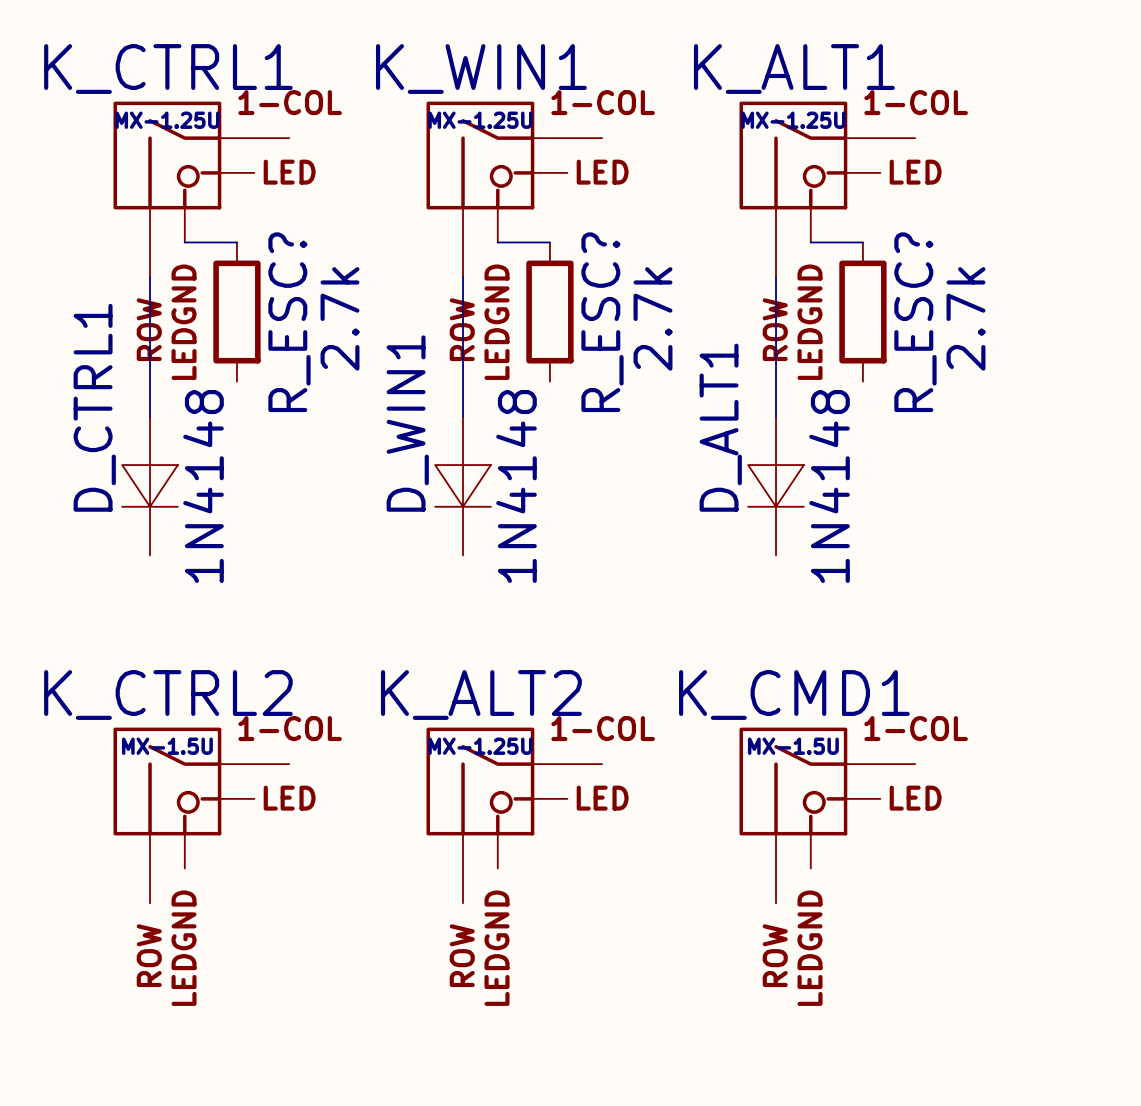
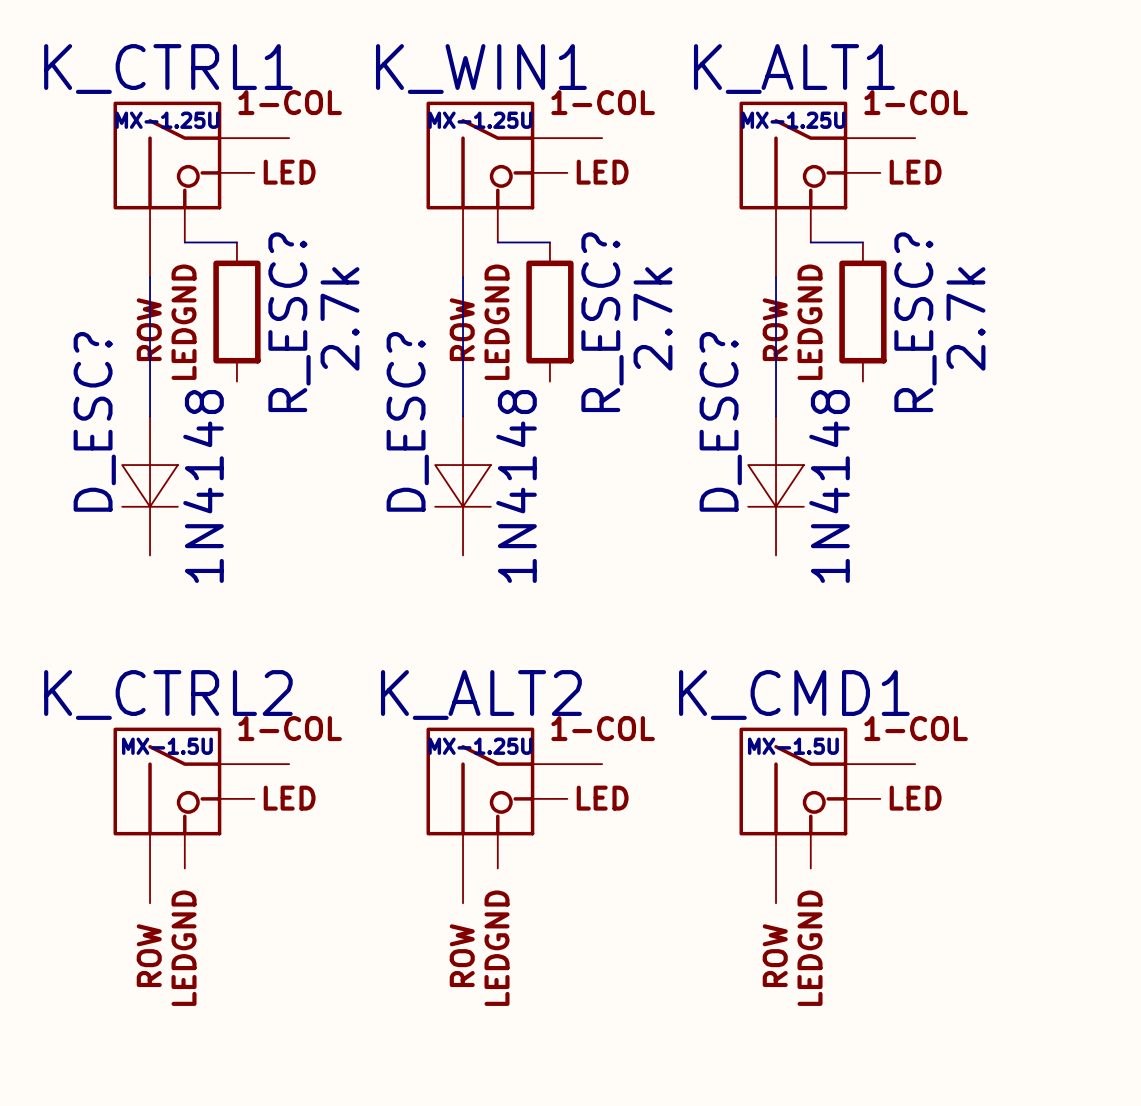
D_CTRL1 name: D_CTRL1 (94, 407) -> D_ESC? (94, 421)
D_WIN1 name: D_WIN1 (407, 423) -> D_ESC? (407, 421)
D_ALT1 name: D_ALT1 (720, 427) -> D_ESC? (720, 421)

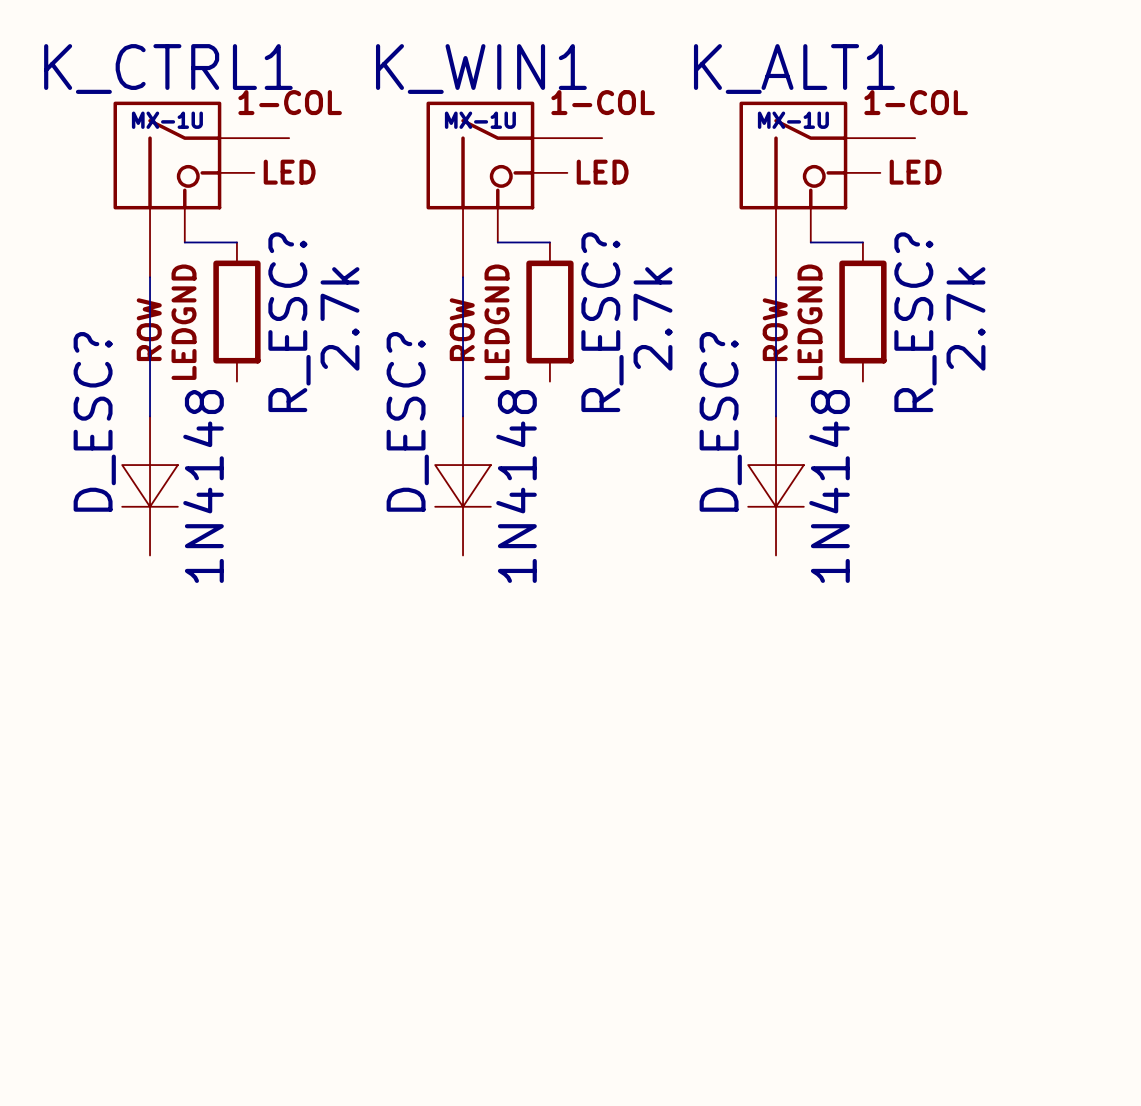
K_CTRL1 value: MX-1.25U (167, 120) -> MX-1U (167, 120)
K_WIN1 value: MX-1.25U (480, 120) -> MX-1U (480, 120)
K_ALT1 value: MX-1.25U (793, 120) -> MX-1U (793, 120)
K_CTRL2: MX-1.5U (201, 815) -> none
K_ALT2: MX-1.25U (514, 815) -> none
K_CMD1: MX-1.5U (827, 815) -> none

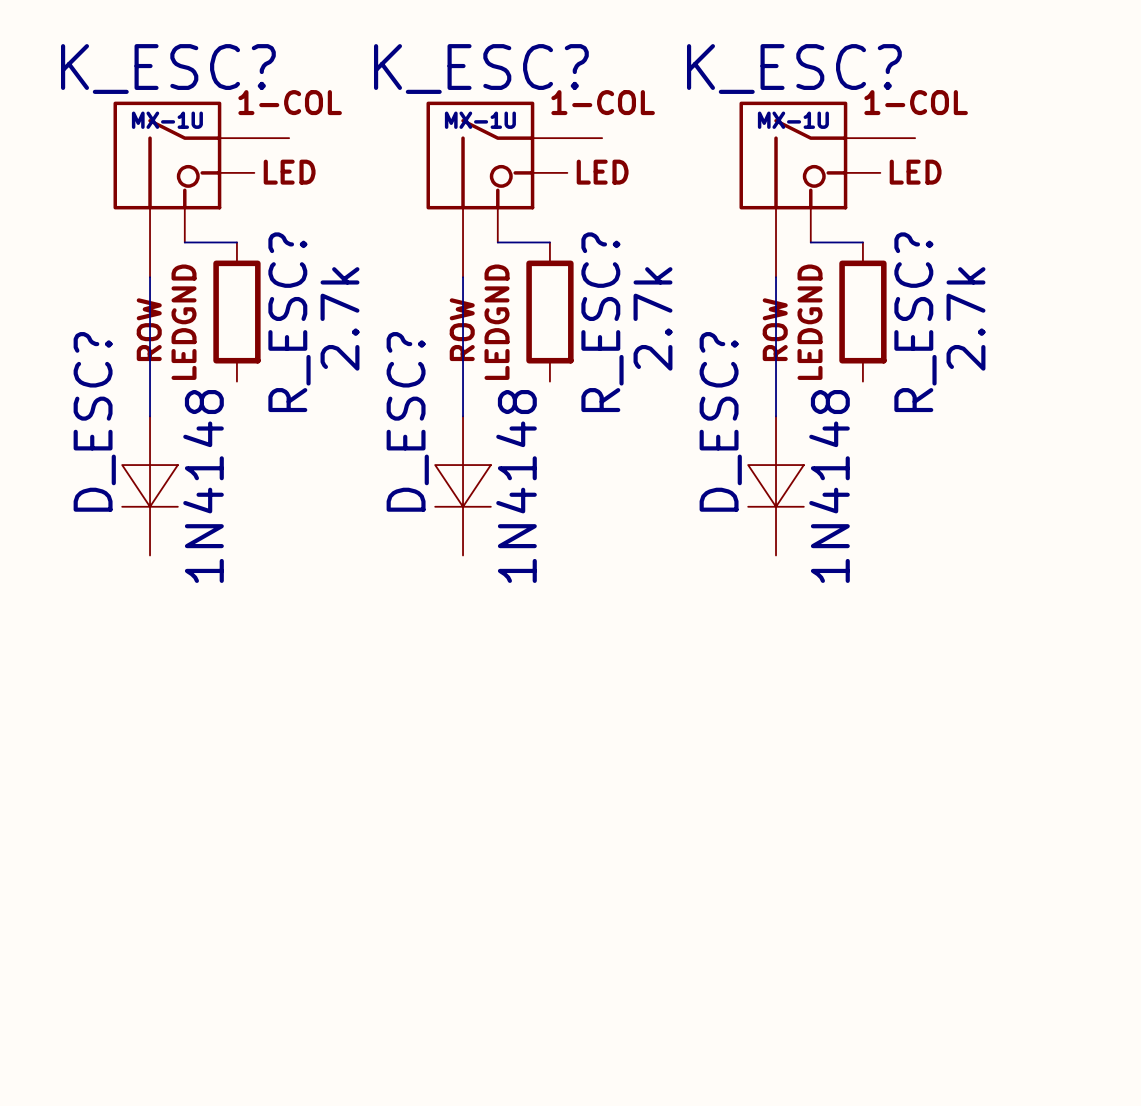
K_CTRL1 name: K_CTRL1 (168, 69) -> K_ESC? (168, 69)
K_WIN1 name: K_WIN1 (481, 69) -> K_ESC? (481, 69)
K_ALT1 name: K_ALT1 (794, 69) -> K_ESC? (794, 69)

